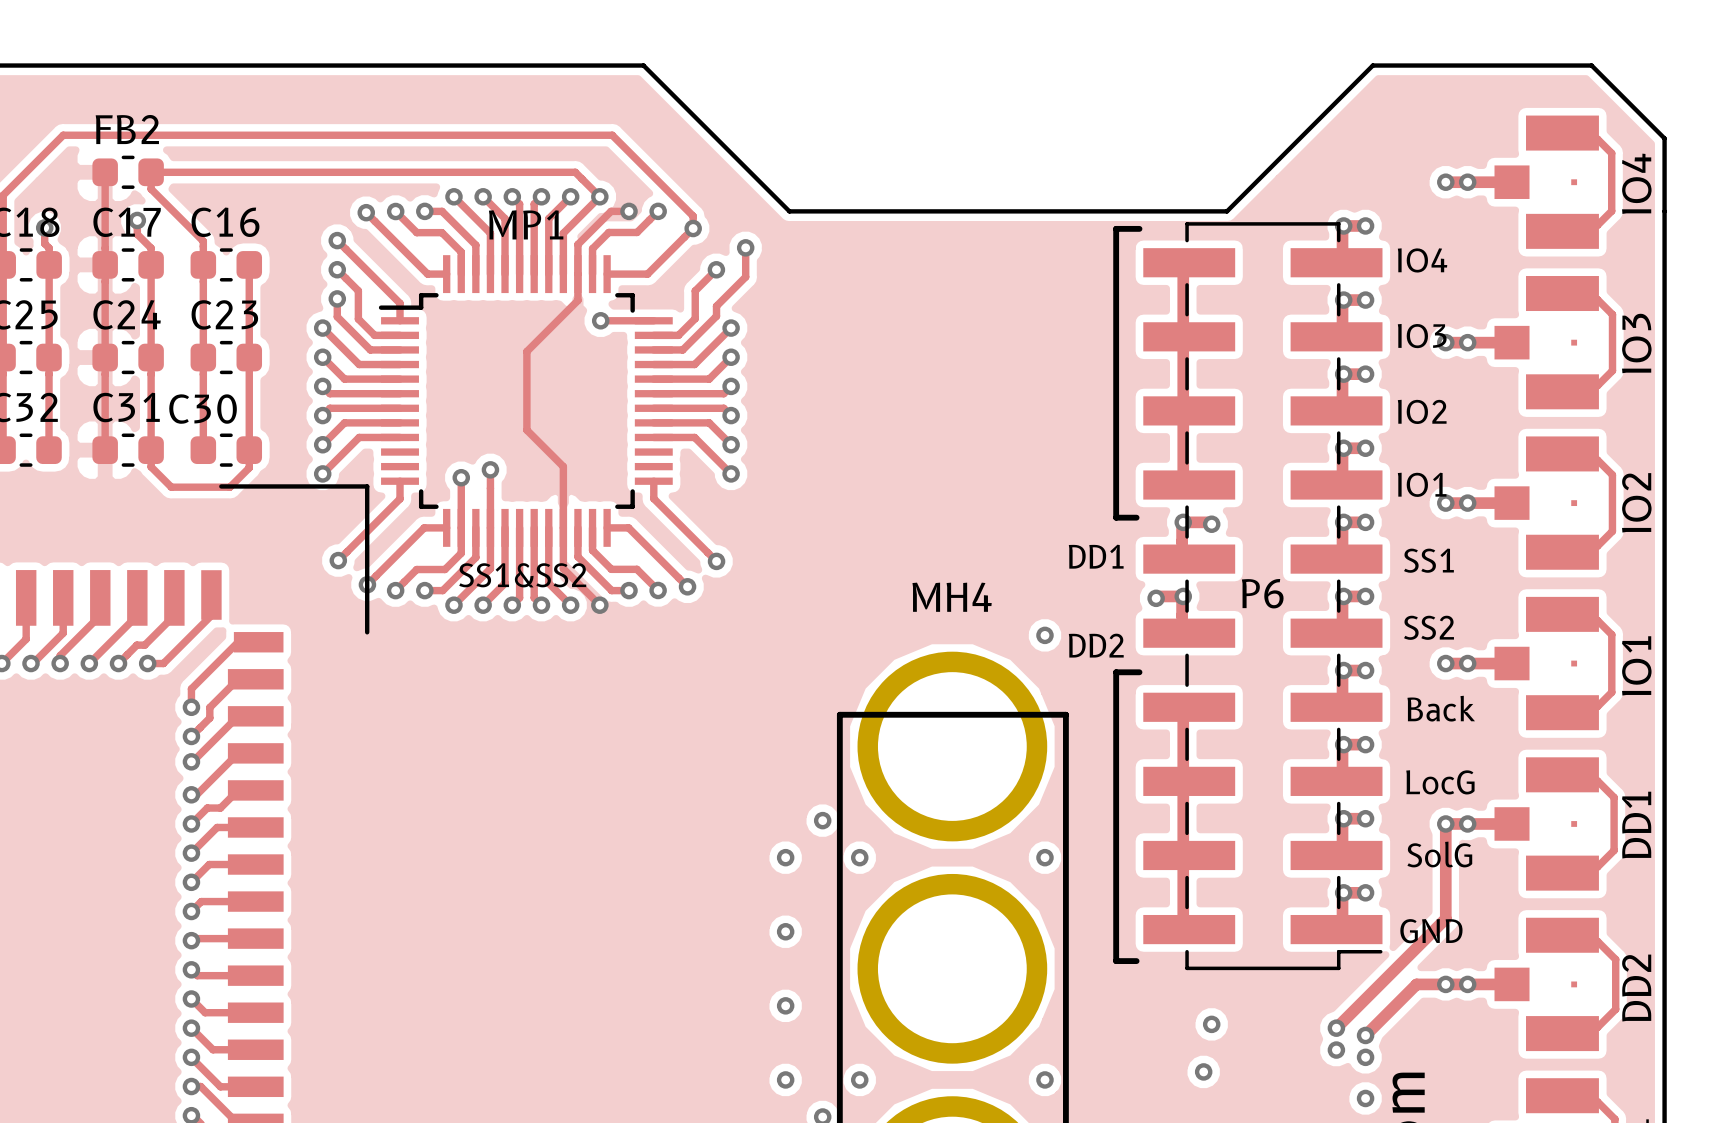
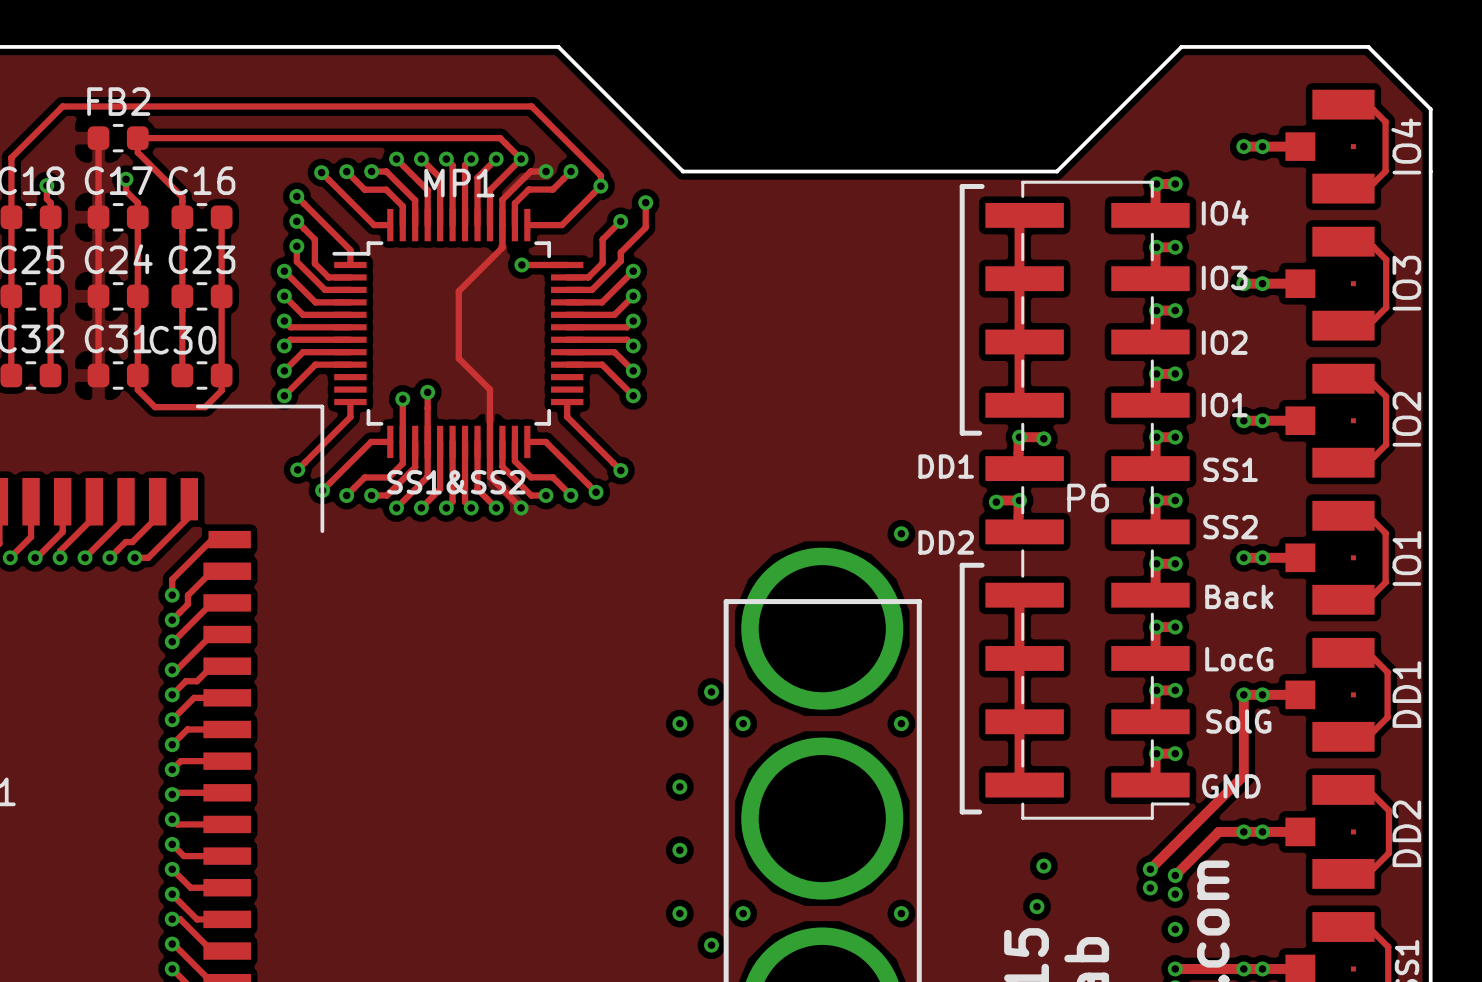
MH4 name: MH4 (952, 597) -> none

